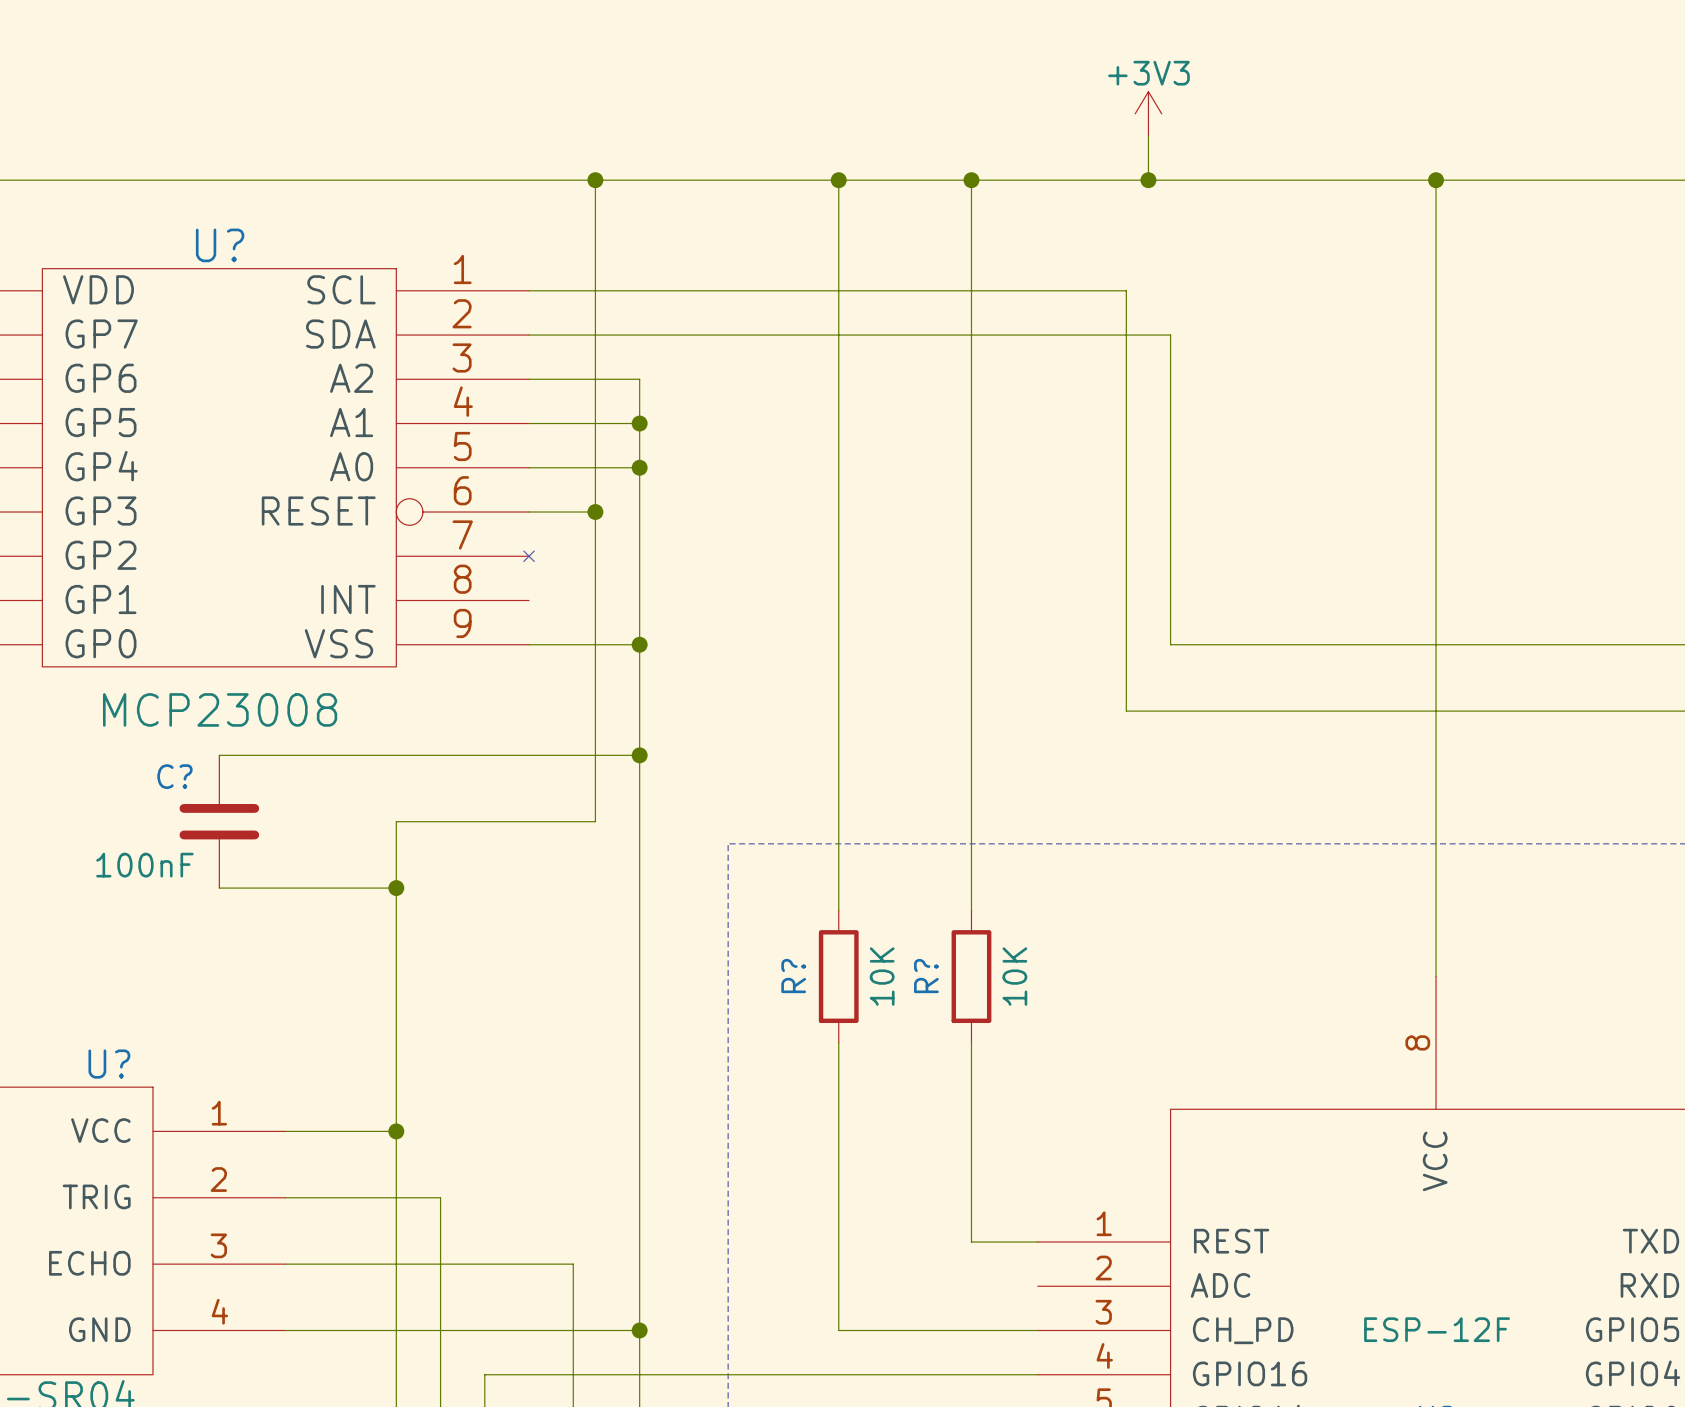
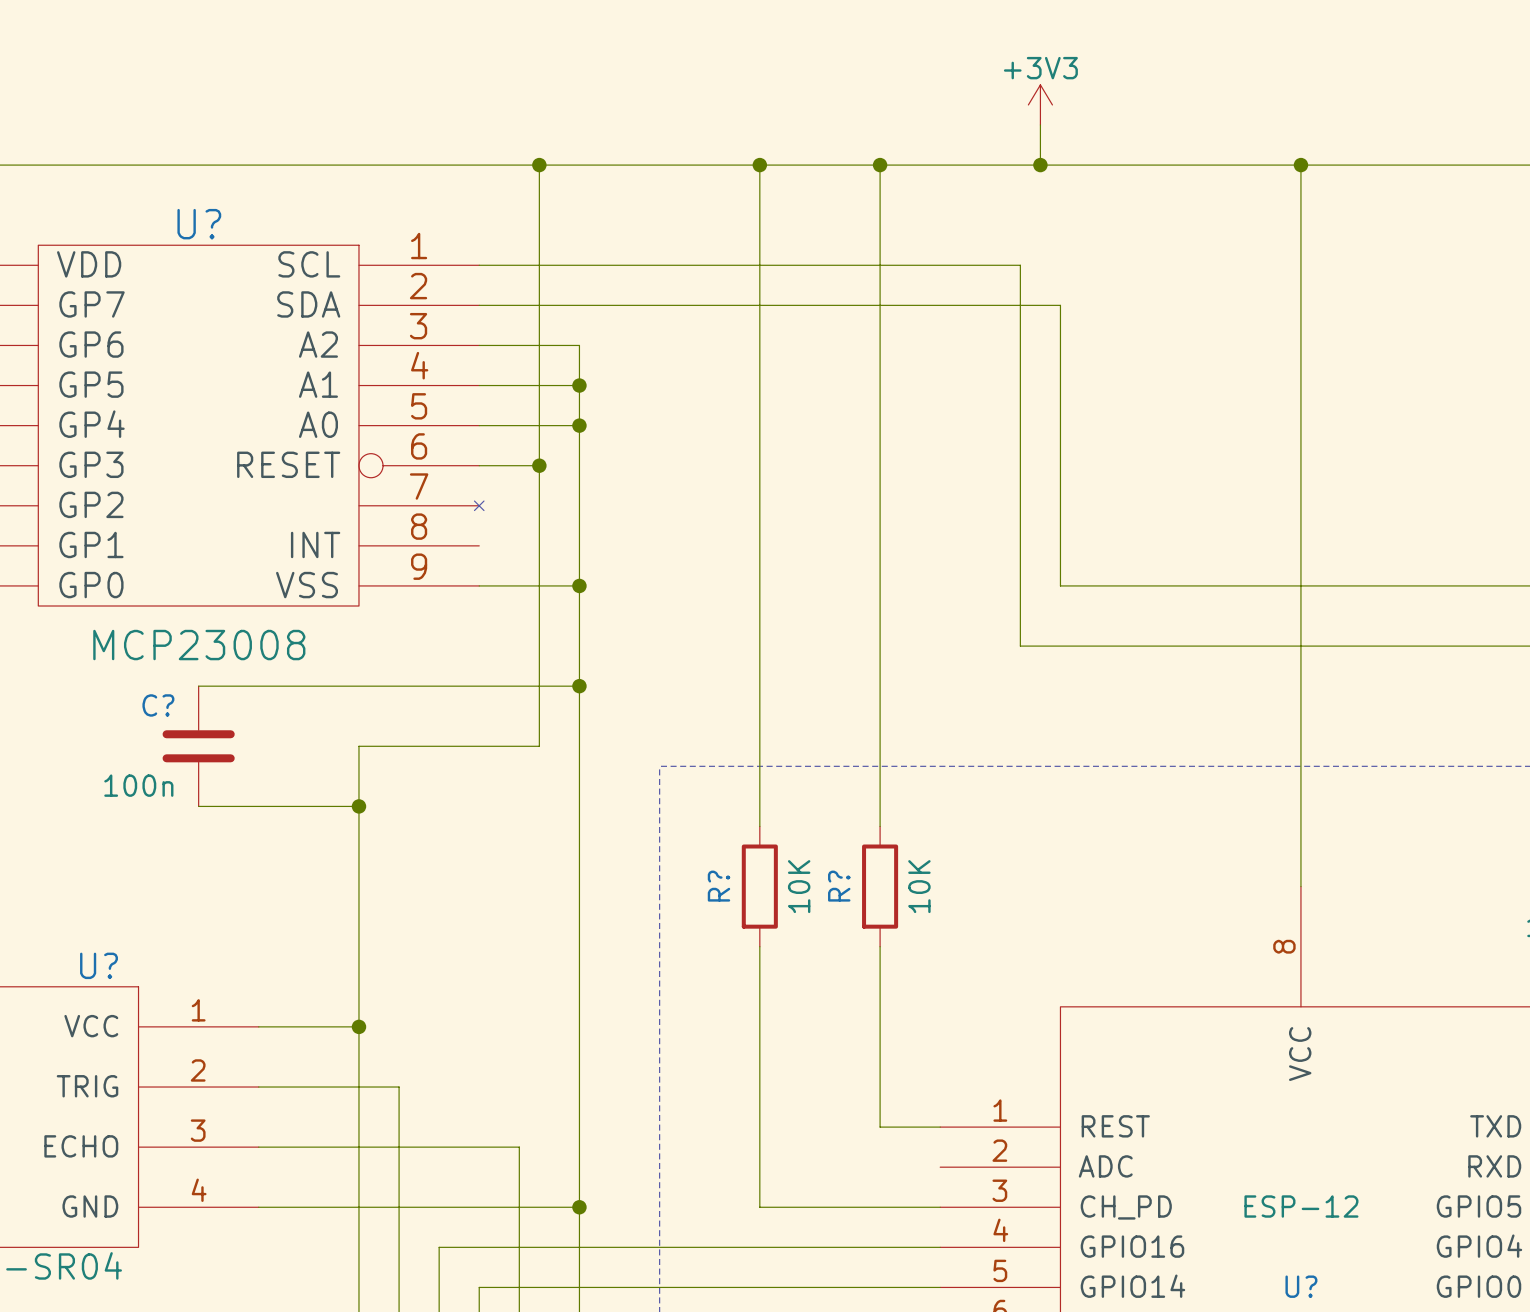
C? value: 100nF (144, 865) -> 100n (138, 785)
U? value: ESP-12F (1437, 1329) -> ESP-12 (1301, 1206)

